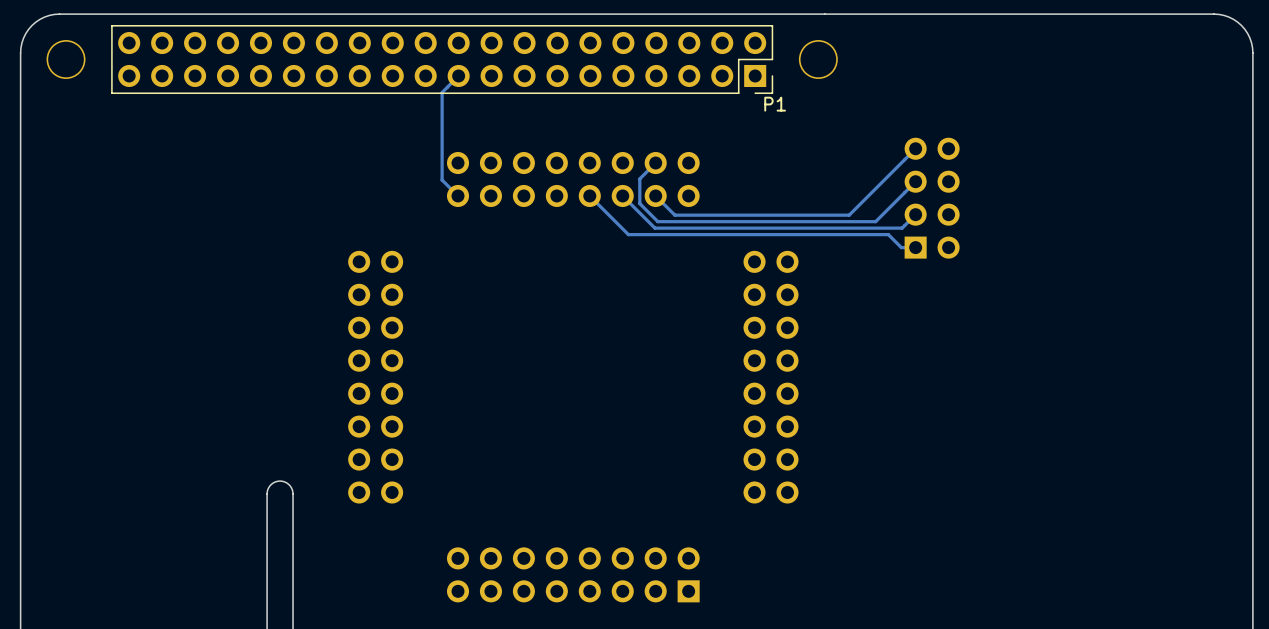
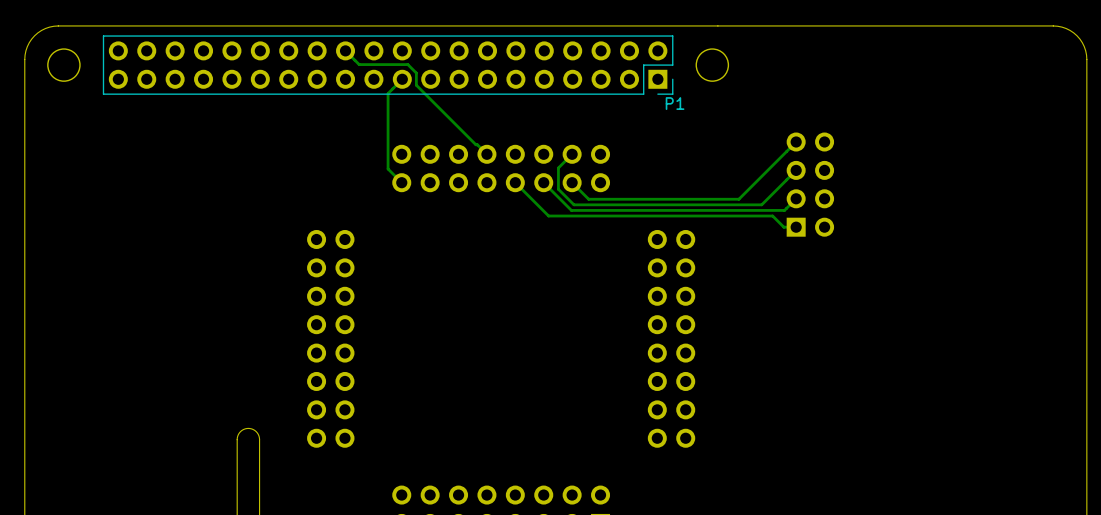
track: none -> (345, 50) (359, 64) (407, 64) (416, 73) (416, 85) (486, 154)

